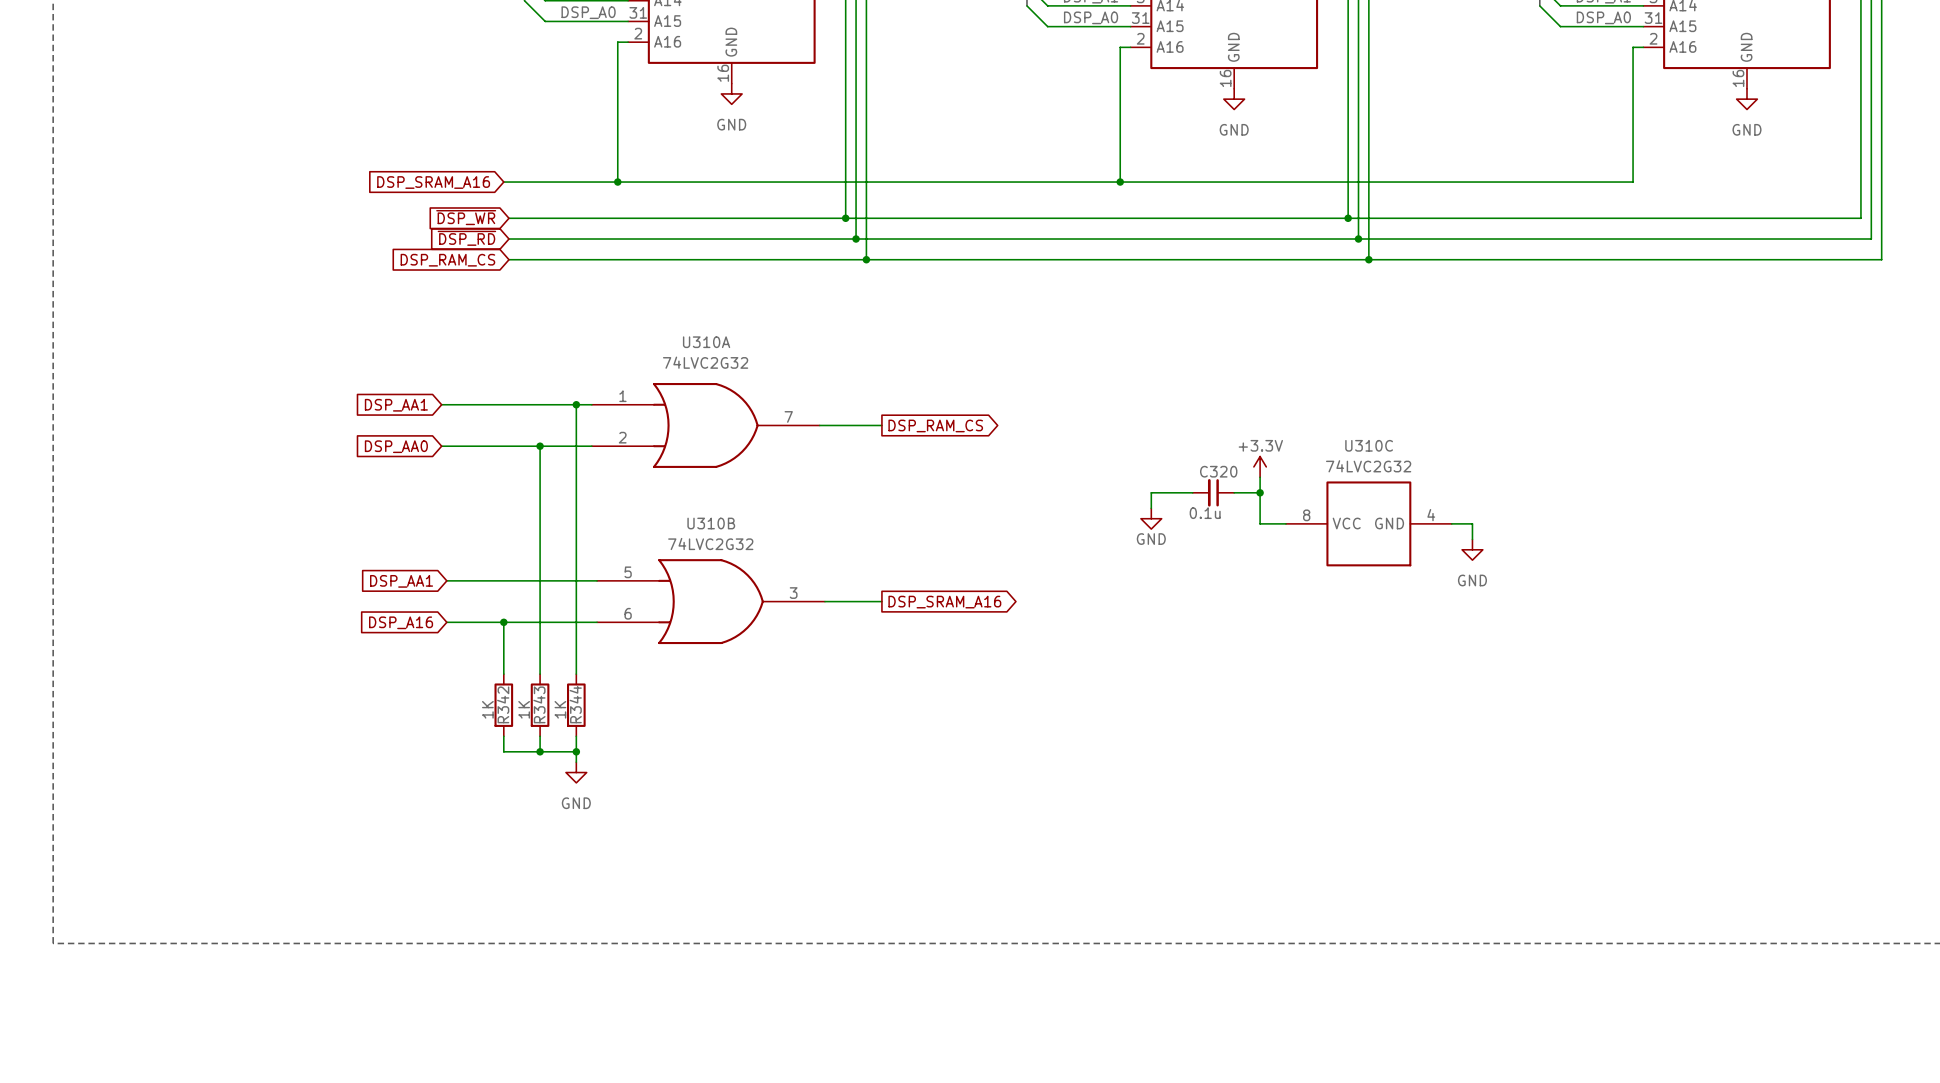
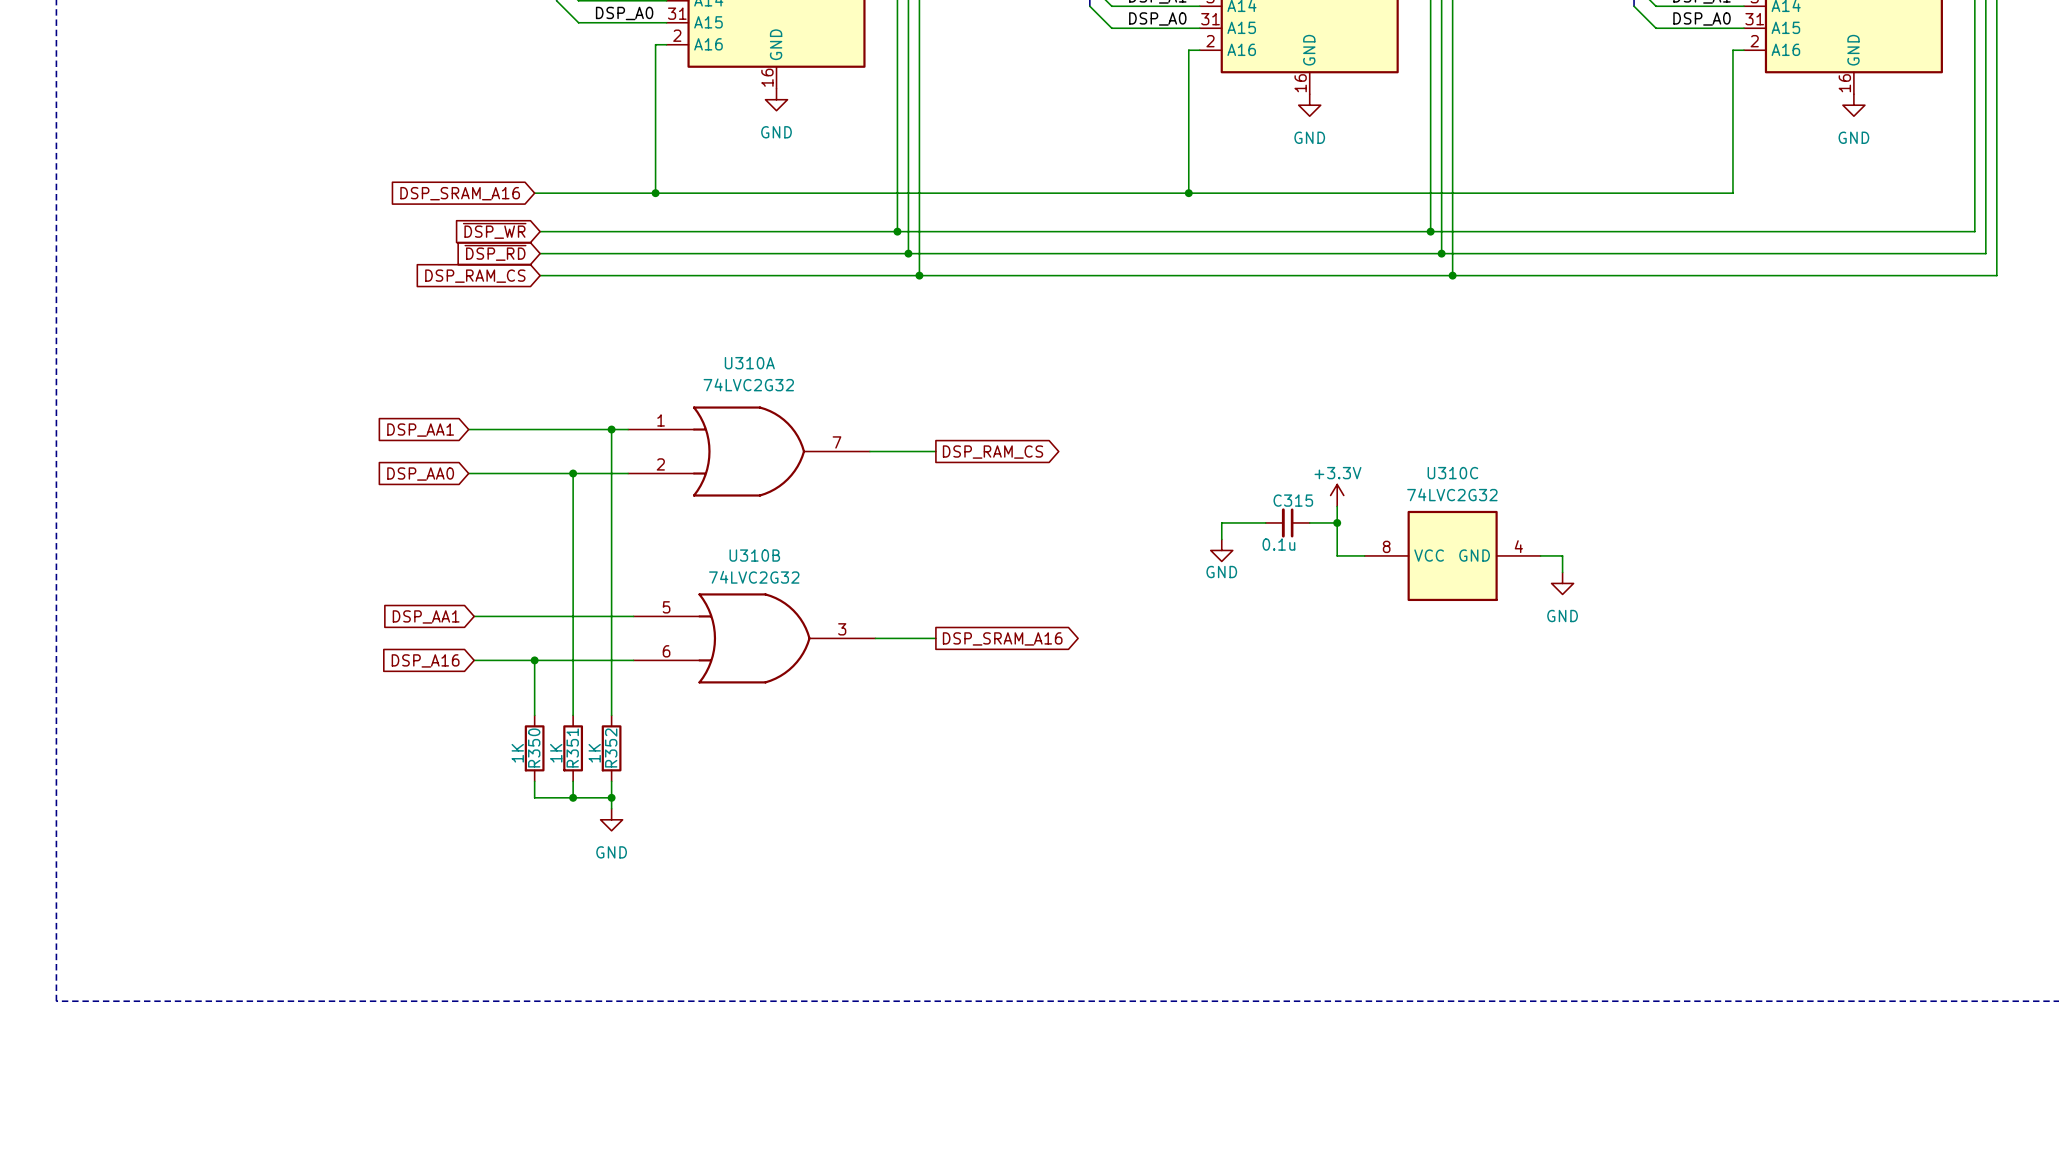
C320 name: C320 (1218, 471) -> C315 (1293, 500)
R342 name: R342 (503, 704) -> R350 (534, 748)
R343 name: R343 (539, 704) -> R351 (572, 748)
R344 name: R344 (575, 704) -> R352 (611, 748)

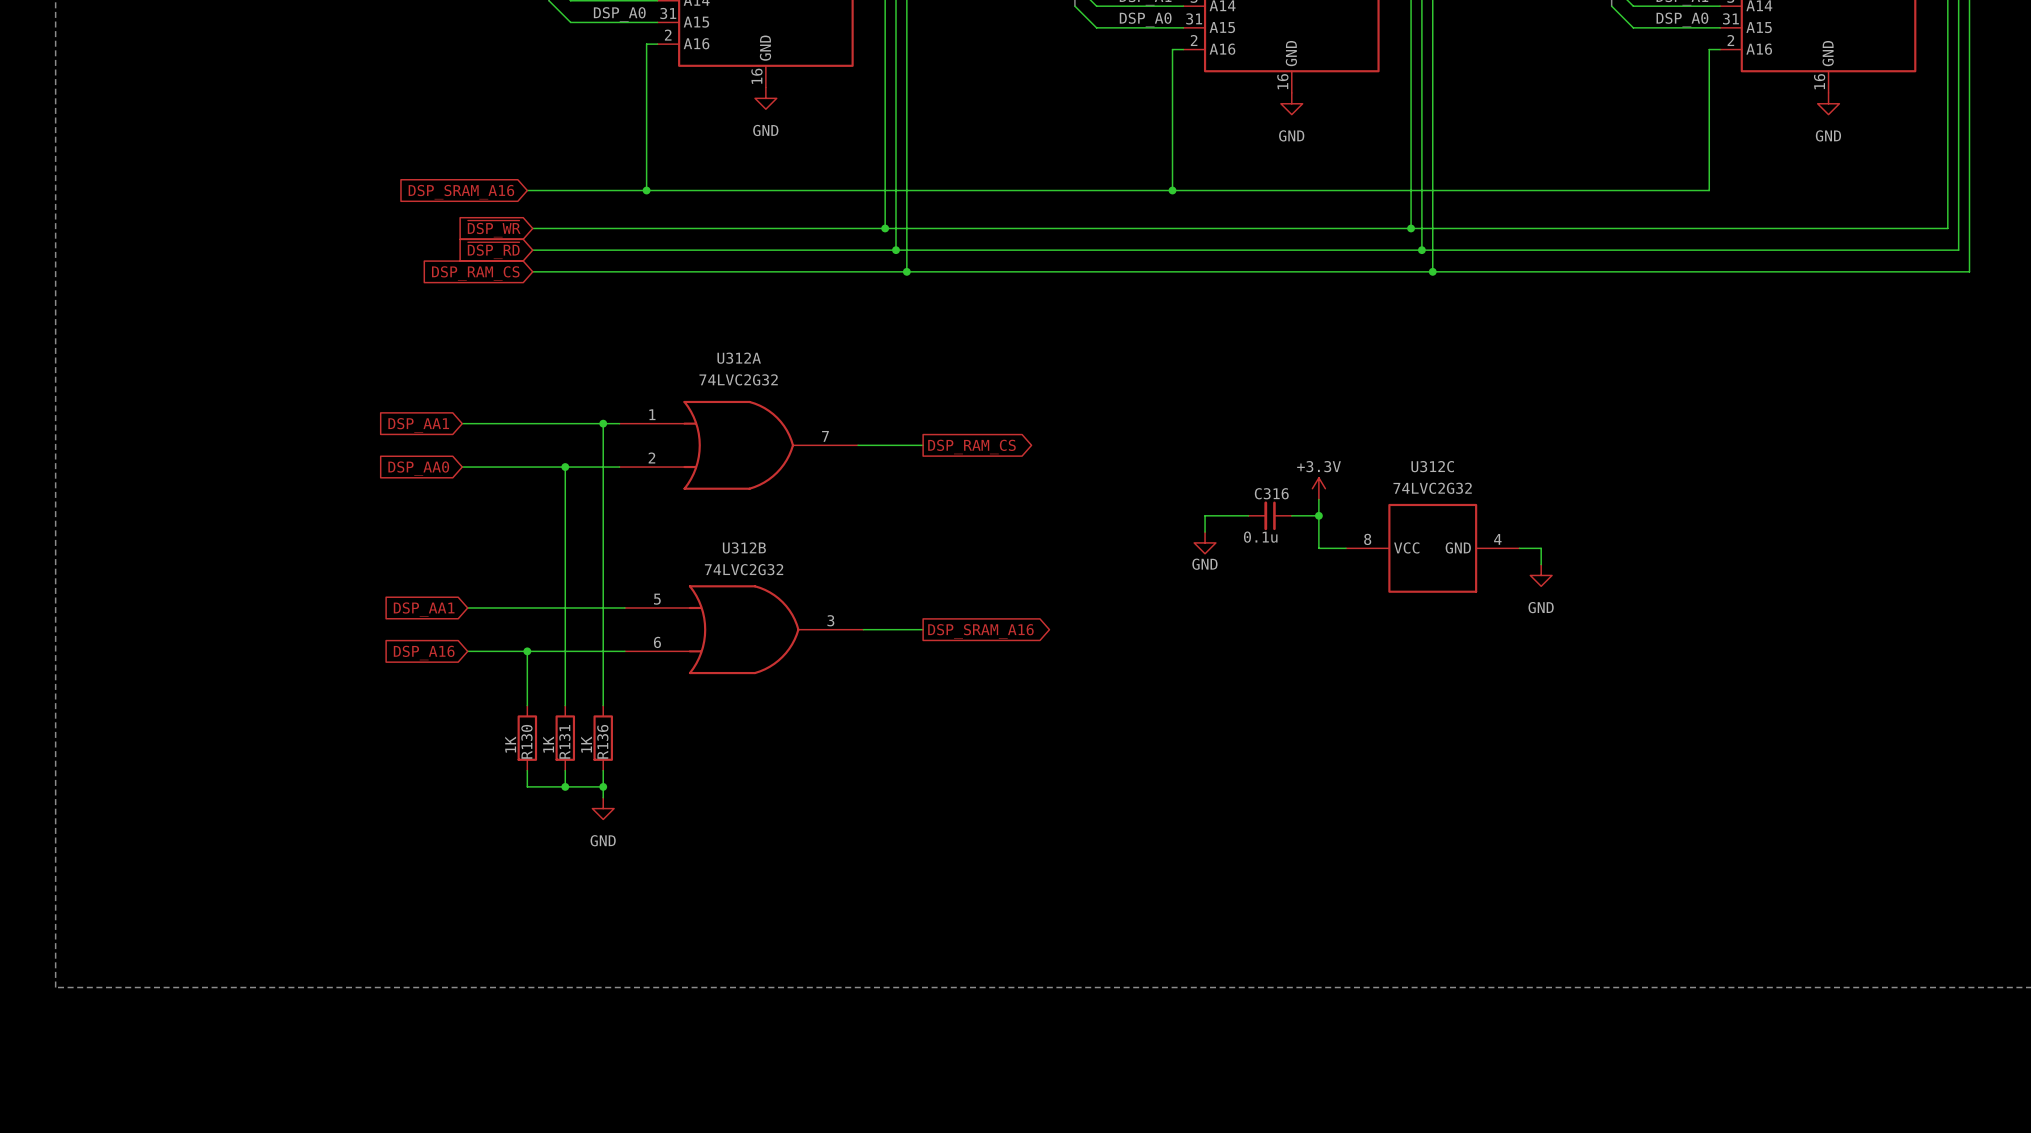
U310A name: U310A (749, 363) -> U312A (739, 358)
U310C name: U310C (1452, 473) -> U312C (1432, 466)
C315 name: C315 (1293, 500) -> C316 (1271, 493)
U310B name: U310B (754, 555) -> U312B (744, 547)
R350 name: R350 (534, 748) -> R130 (526, 741)
R351 name: R351 (572, 748) -> R131 (564, 741)
R352 name: R352 (611, 748) -> R136 (602, 741)

